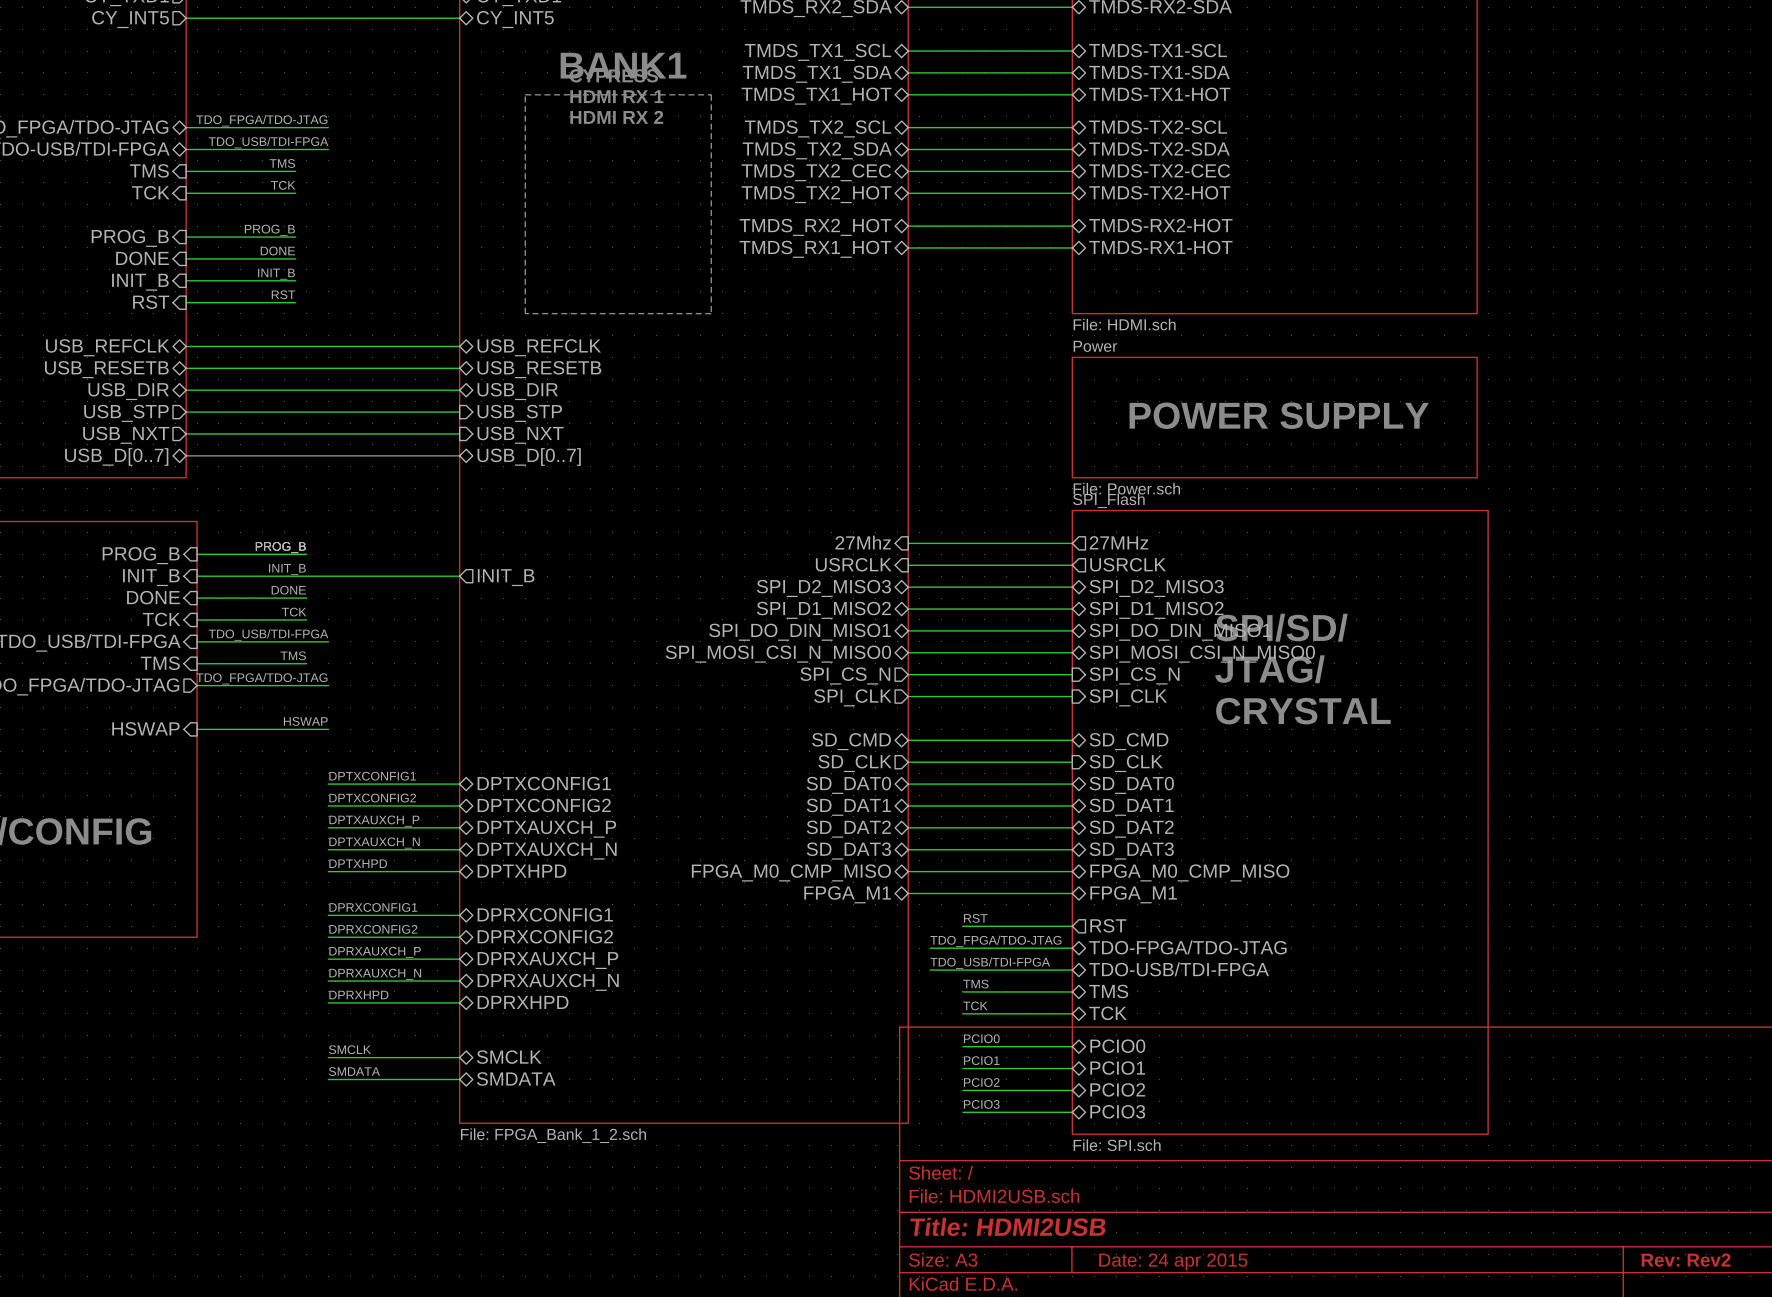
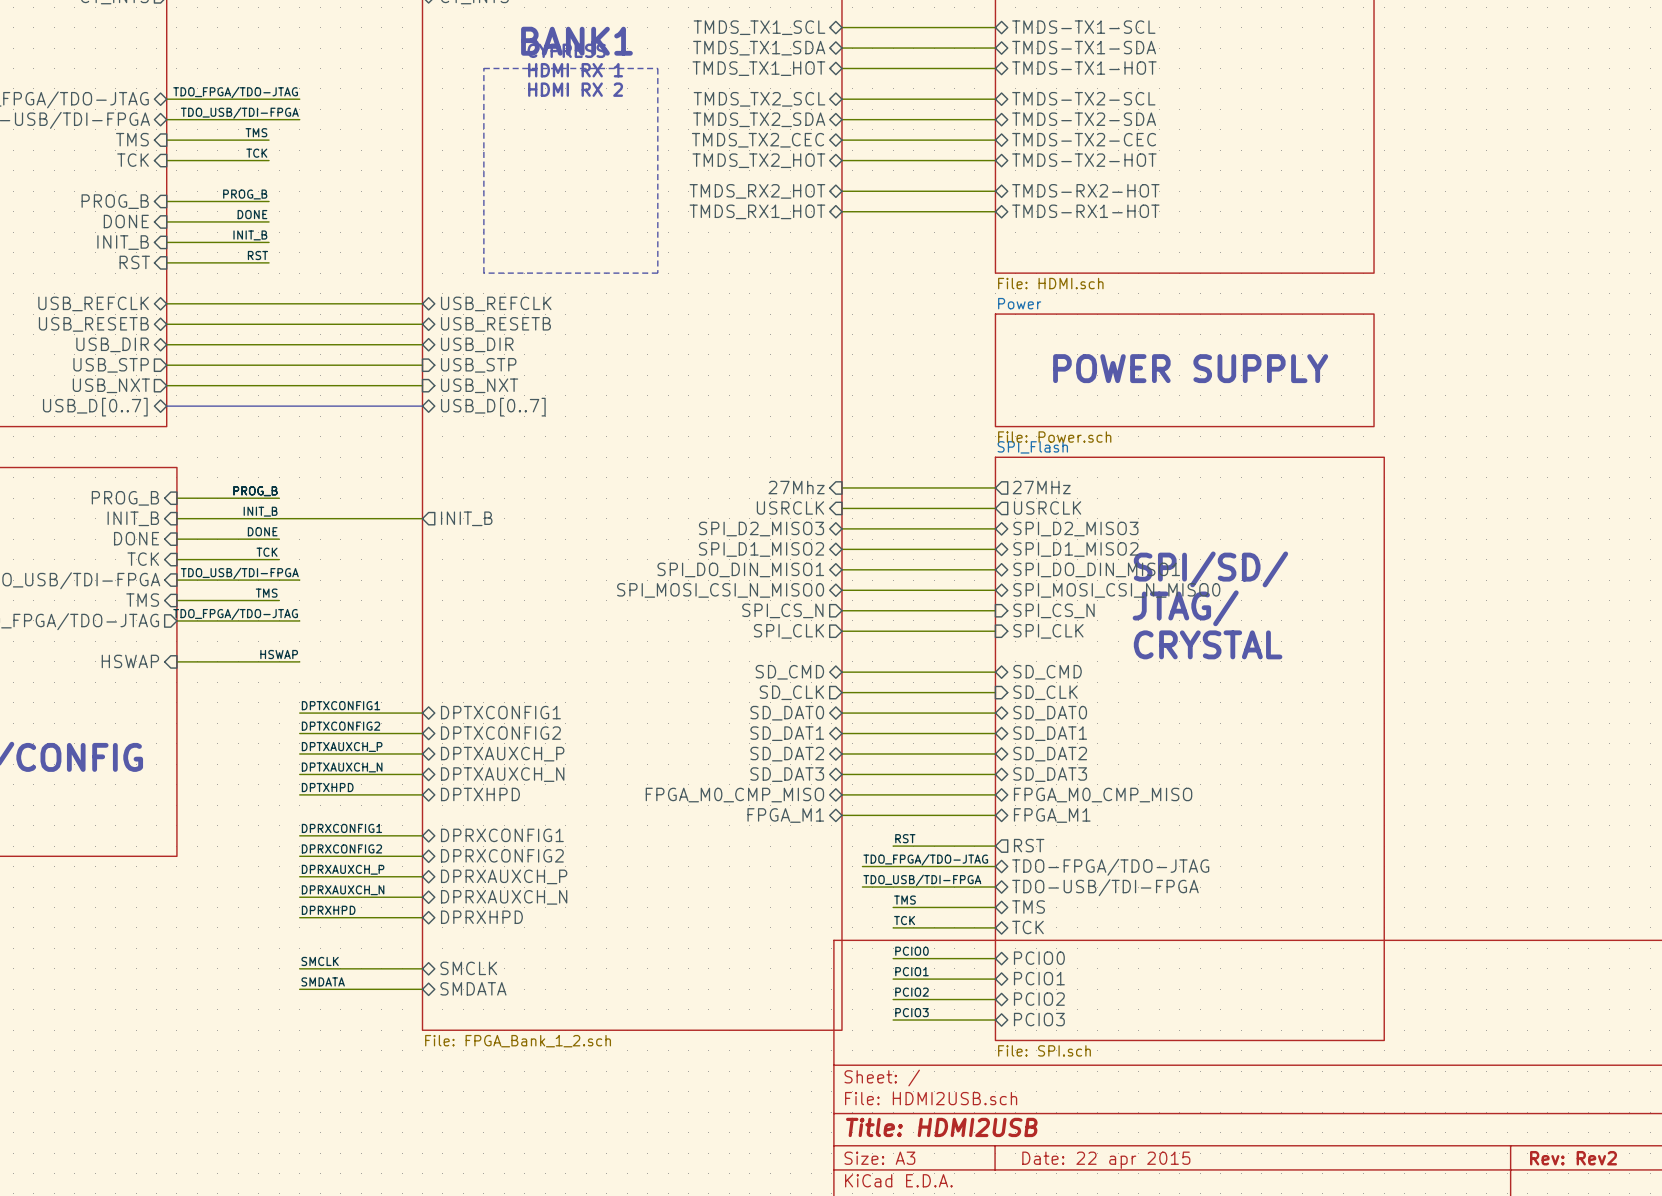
title block: Date: 24 apr 2015 (1173, 1261) -> Date: 22 apr 2015 (1106, 1160)

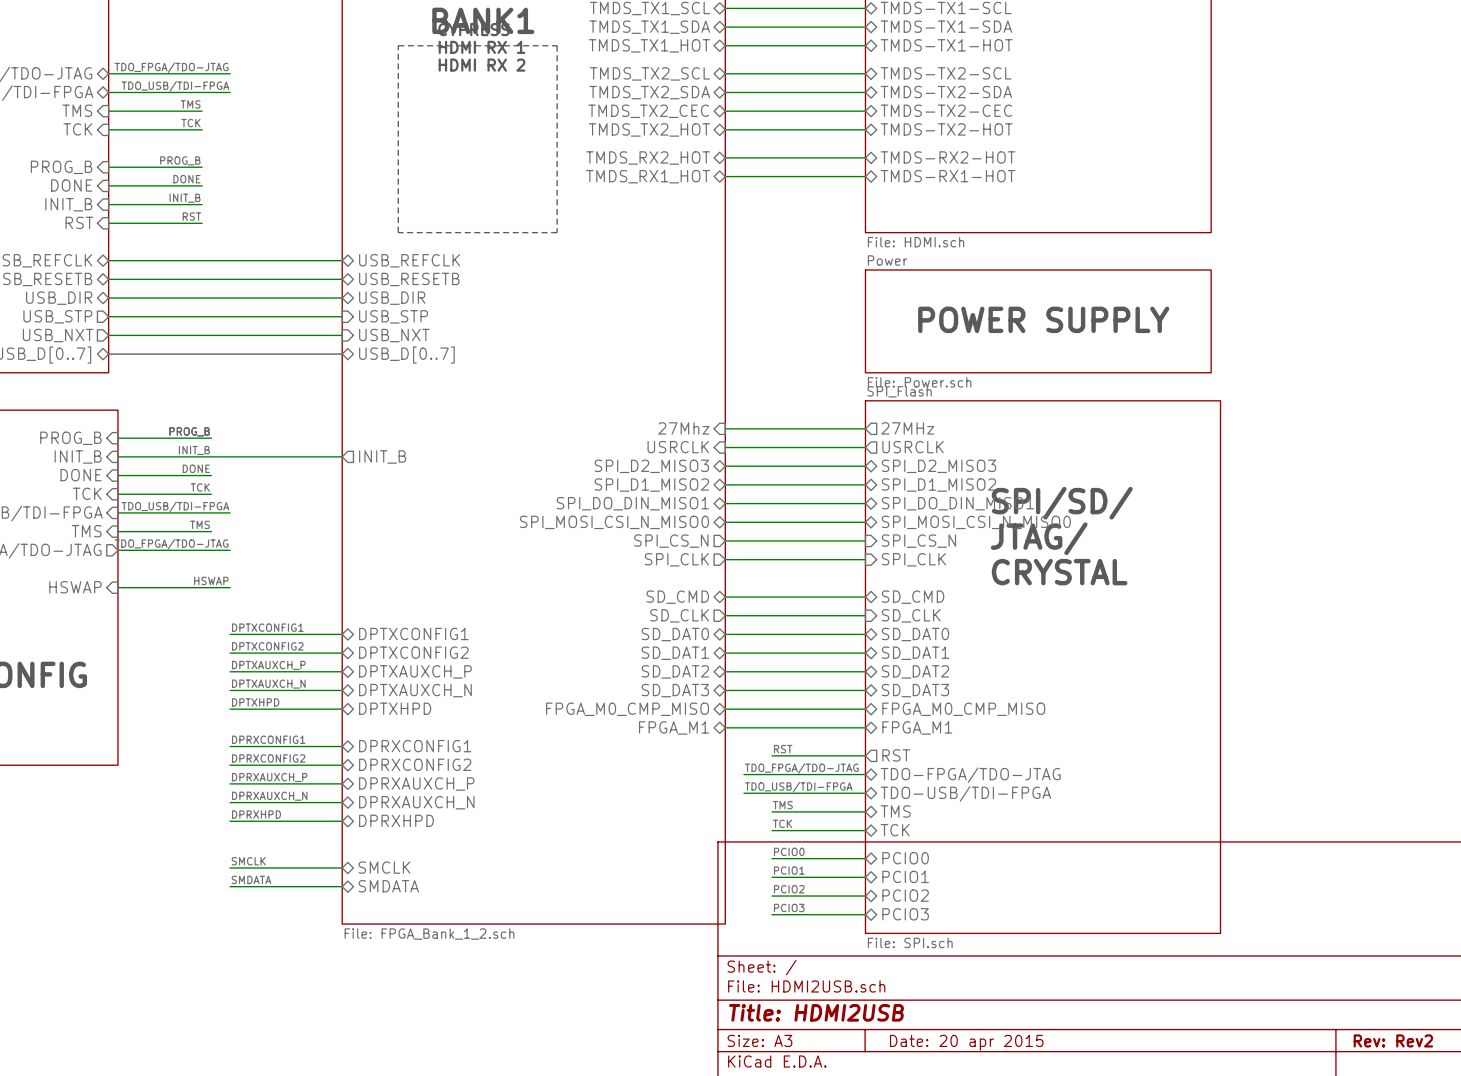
title block: Date: 22 apr 2015 (1106, 1160) -> Date: 20 apr 2015 (966, 1042)

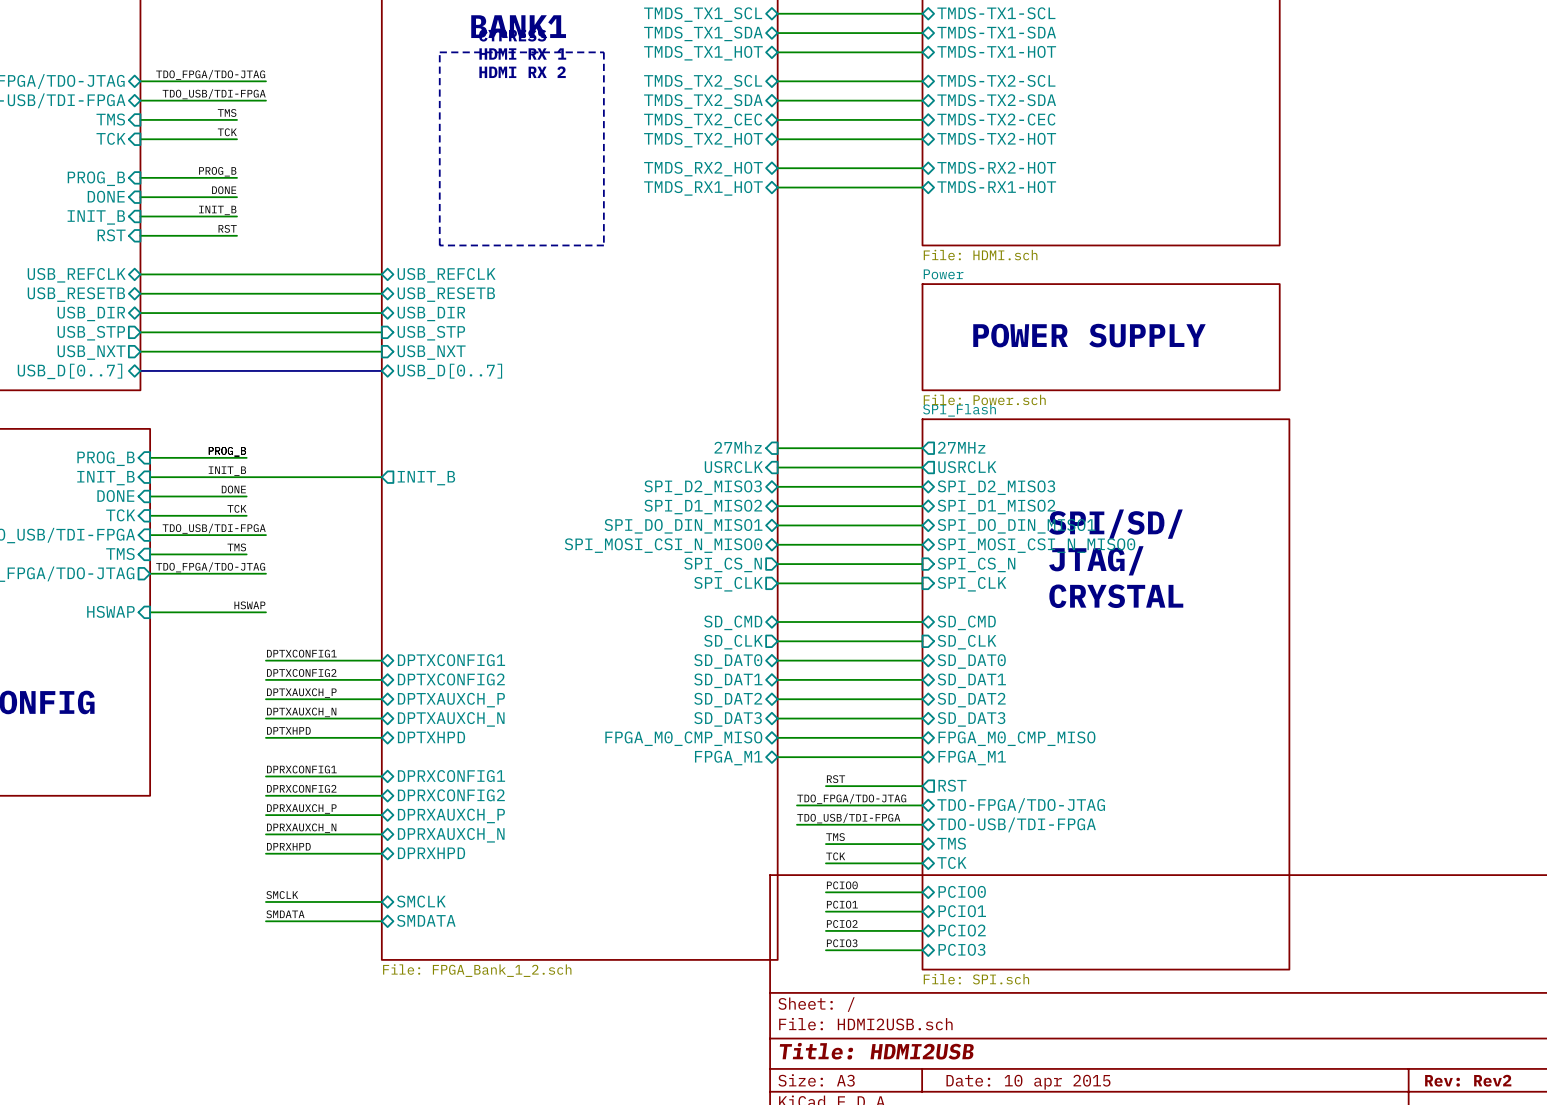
title block: Date: 20 apr 2015 (966, 1042) -> Date: 10 apr 2015 (1028, 1082)

